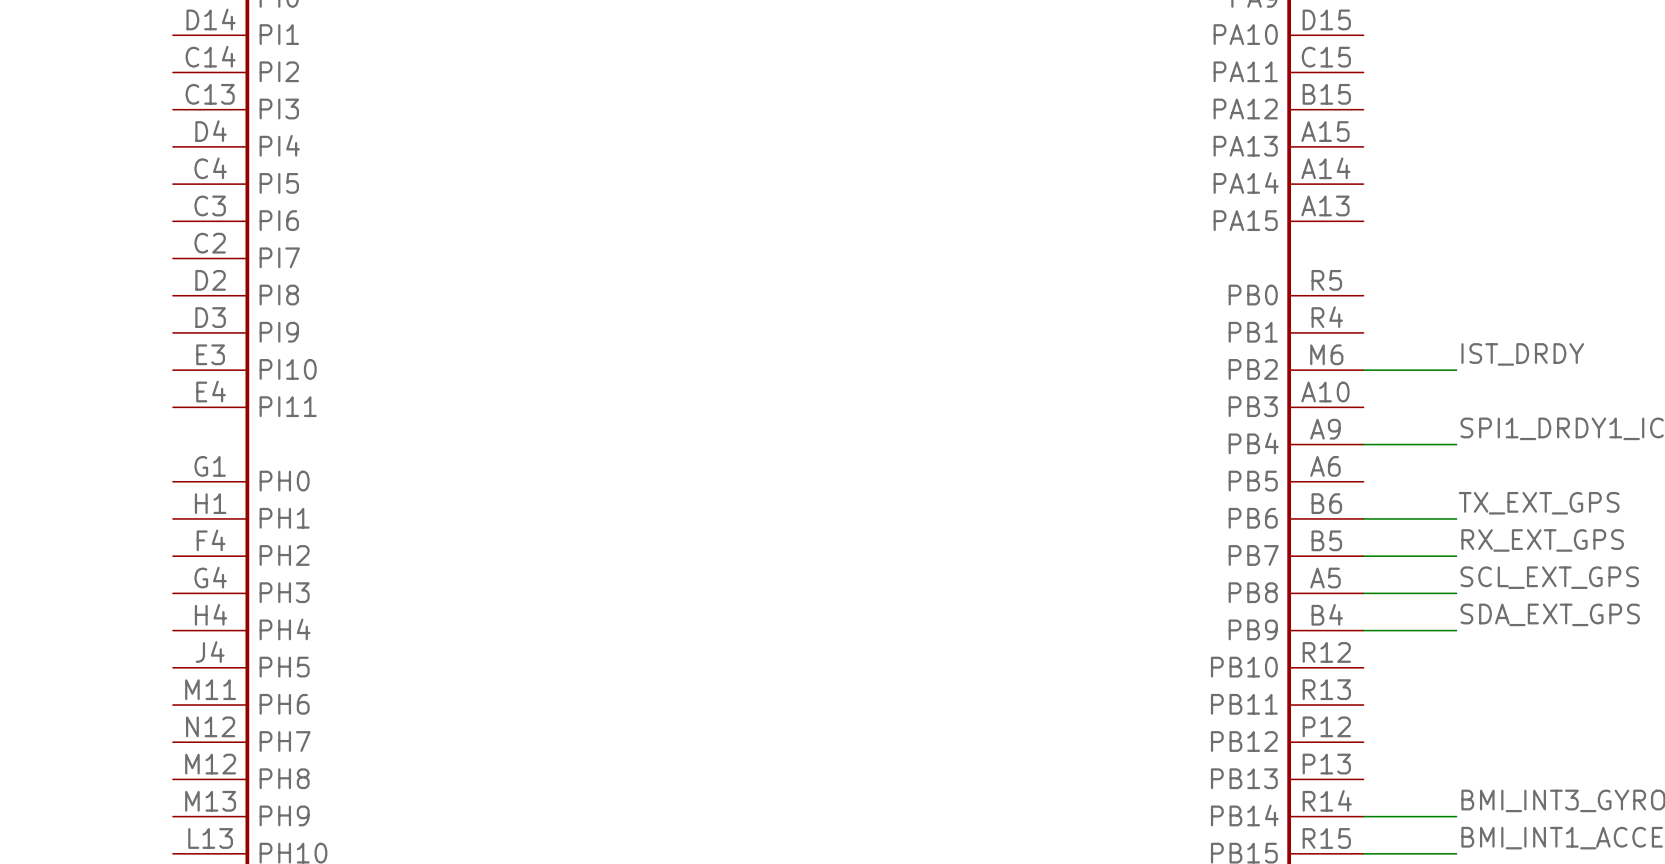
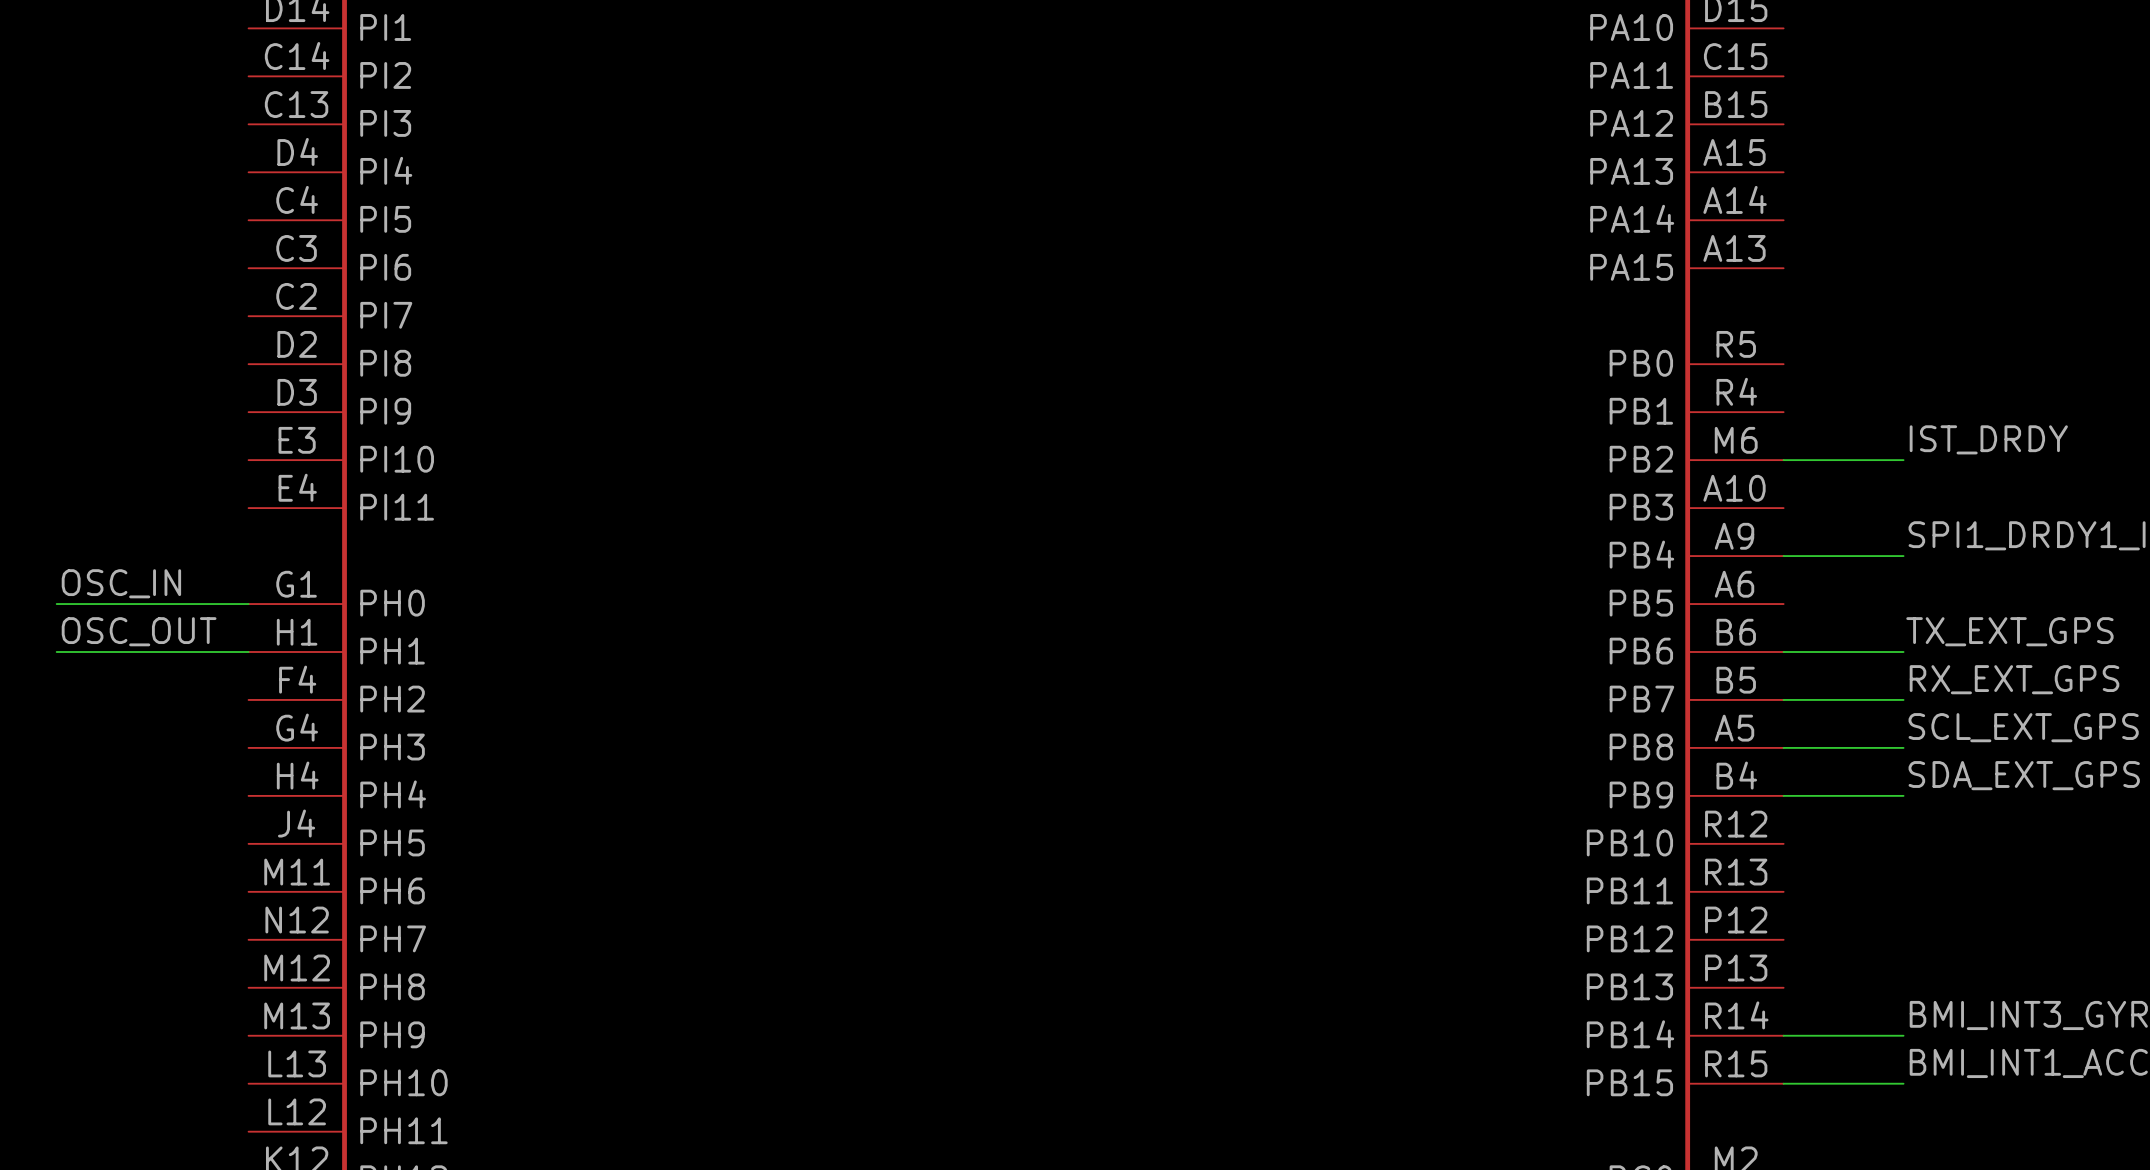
label: none -> OSC_IN (121, 583)
wire: none -> (56, 604) (248, 604)
label: none -> OSC_OUT (139, 631)
wire: none -> (56, 651) (248, 651)

